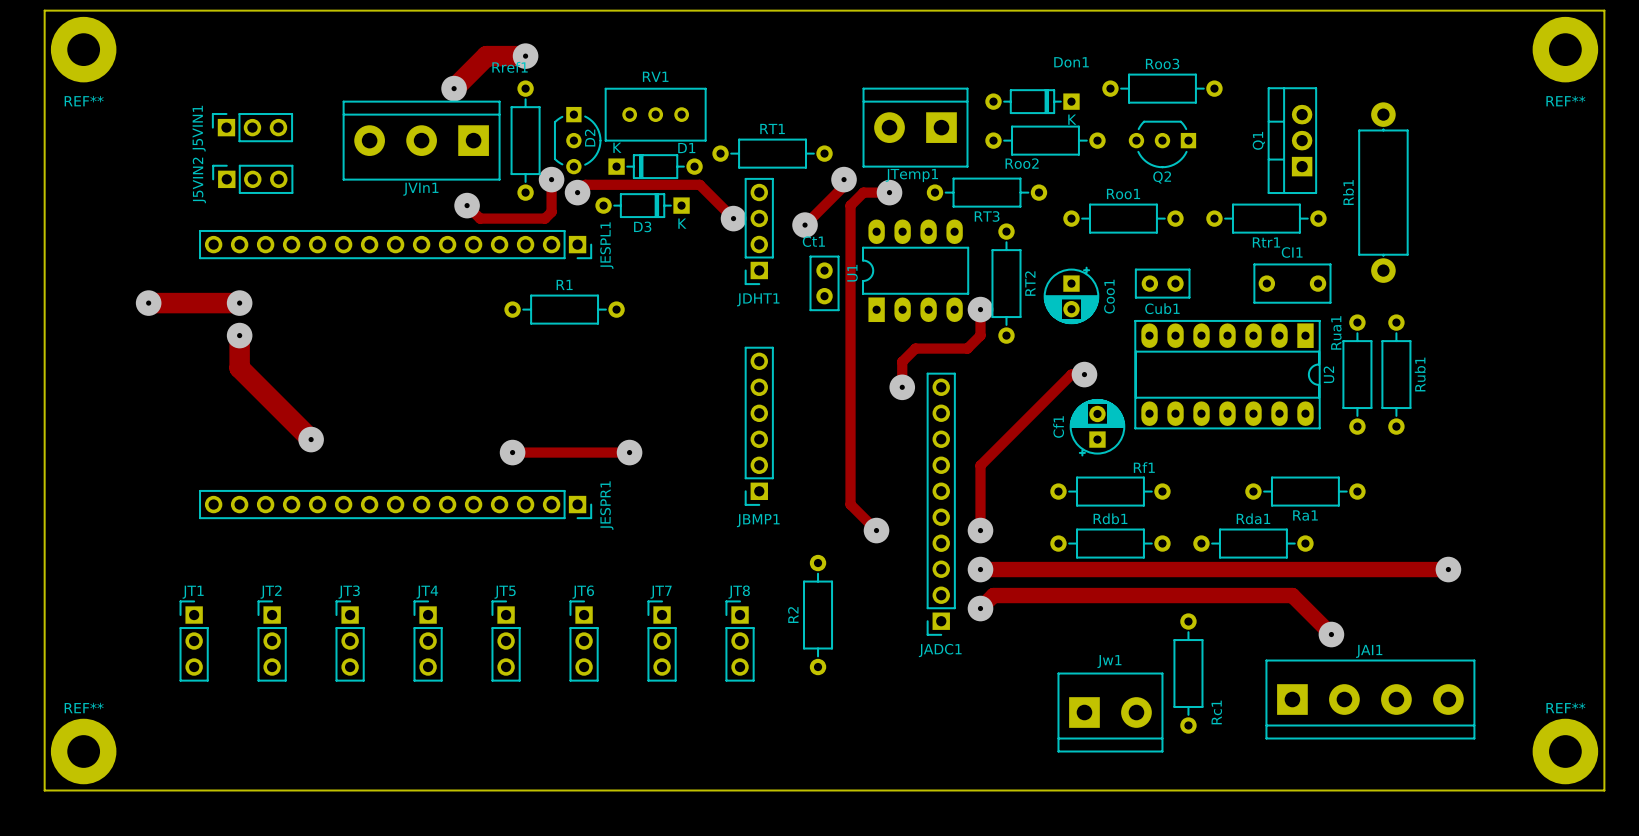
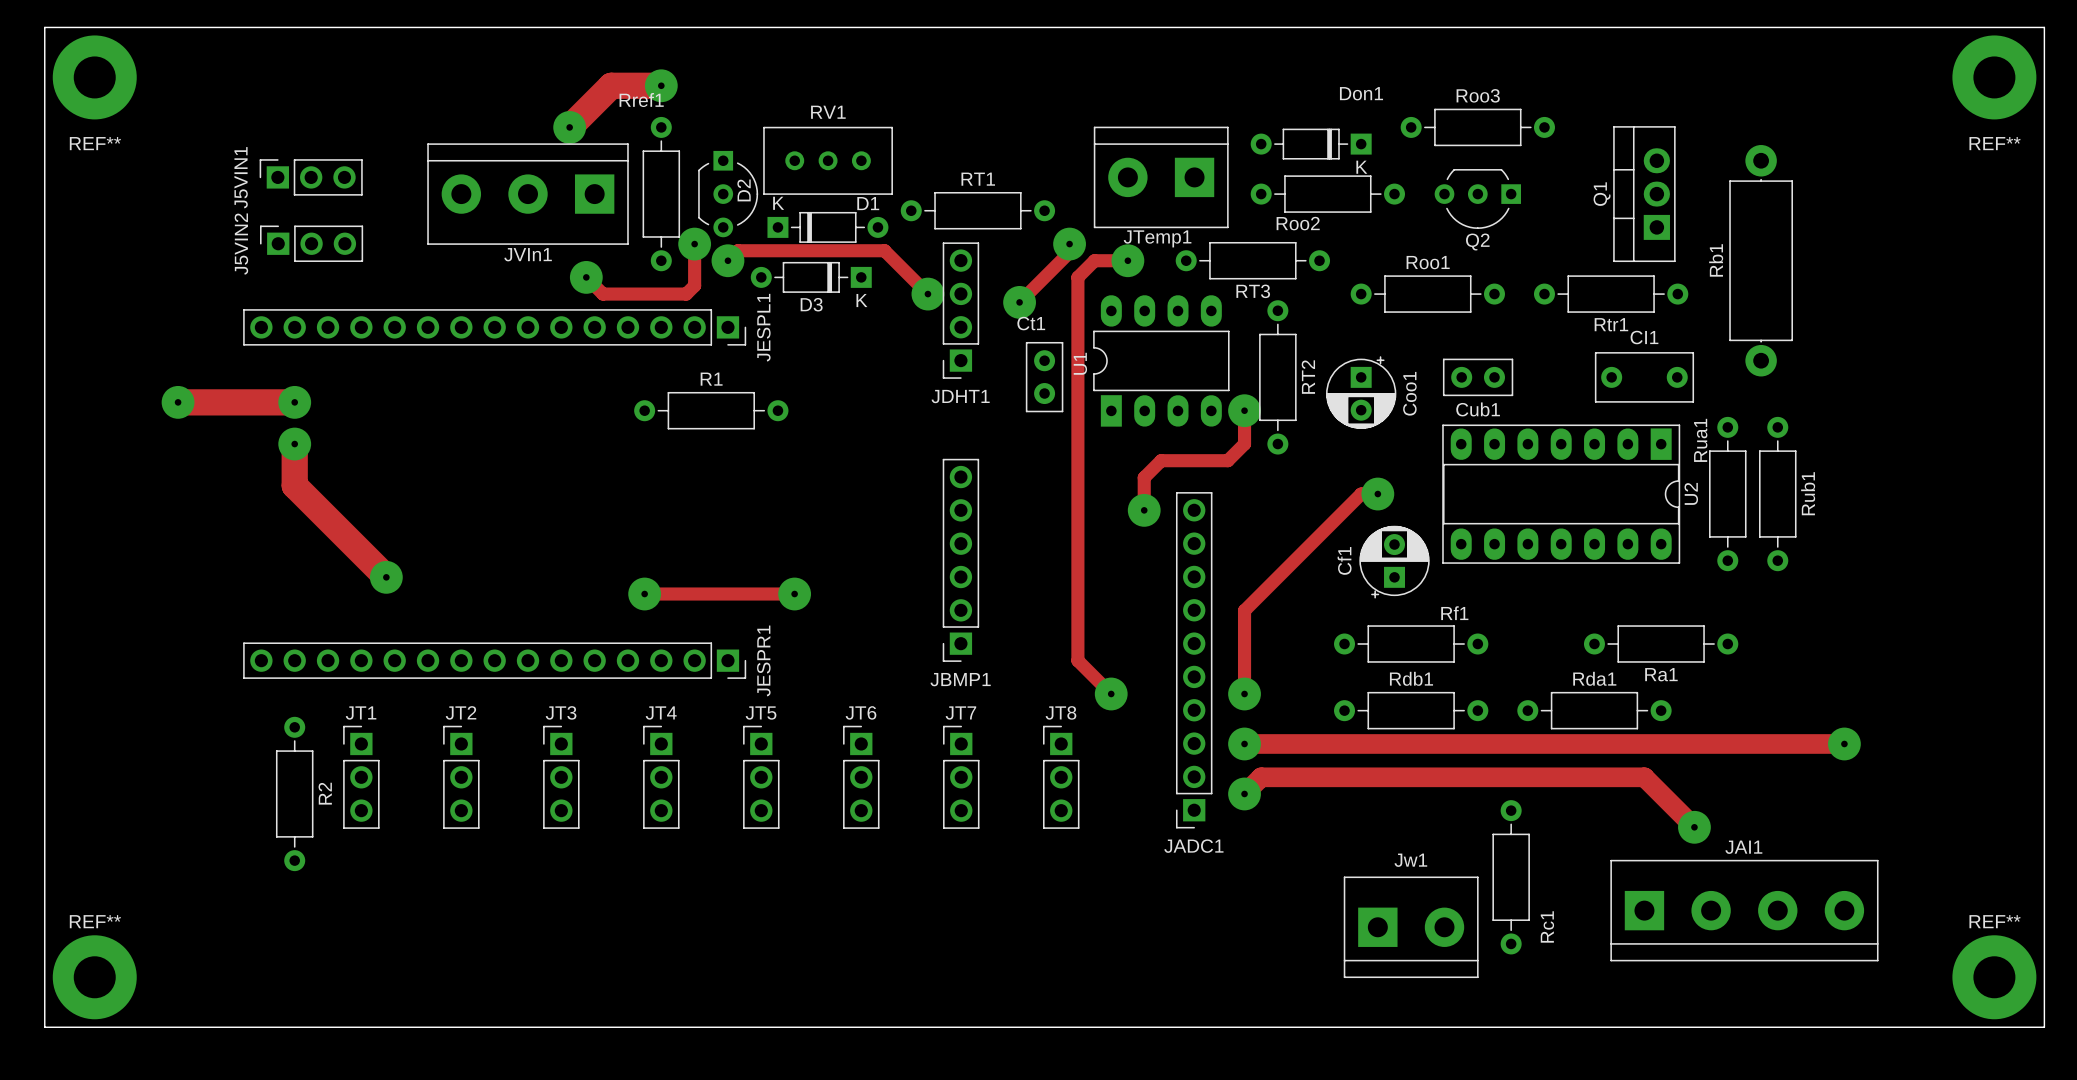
R2 name position: R2 (793, 615) -> R2 (325, 793)
R2 position: (818, 615) -> (294, 793)
JT1 position: (194, 641) -> (361, 777)
JT2 position: (272, 641) -> (461, 777)
JT3 position: (350, 641) -> (561, 777)
JT4 position: (428, 641) -> (661, 777)
JT5 position: (506, 641) -> (761, 777)
JT6 position: (584, 641) -> (861, 777)
JT7 position: (662, 641) -> (961, 777)
JT8 position: (740, 641) -> (1061, 777)

